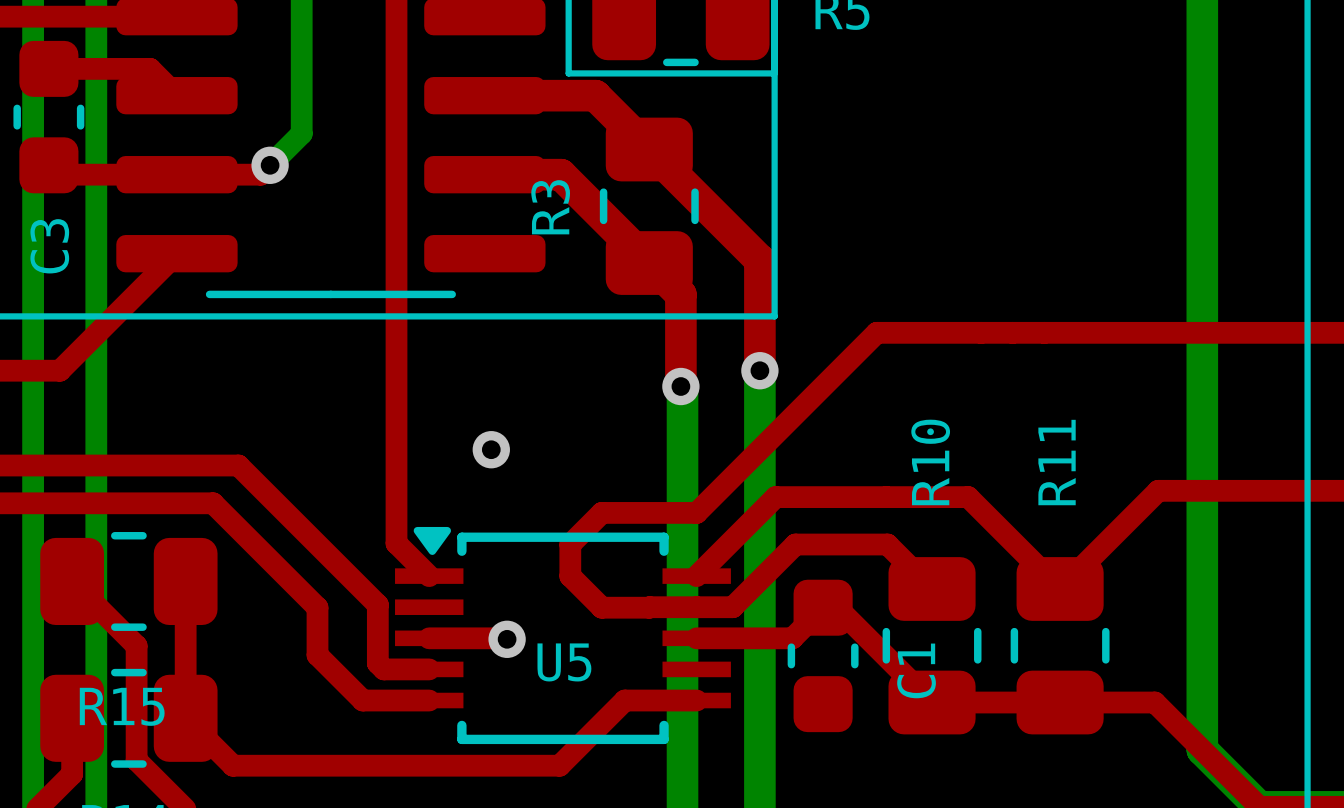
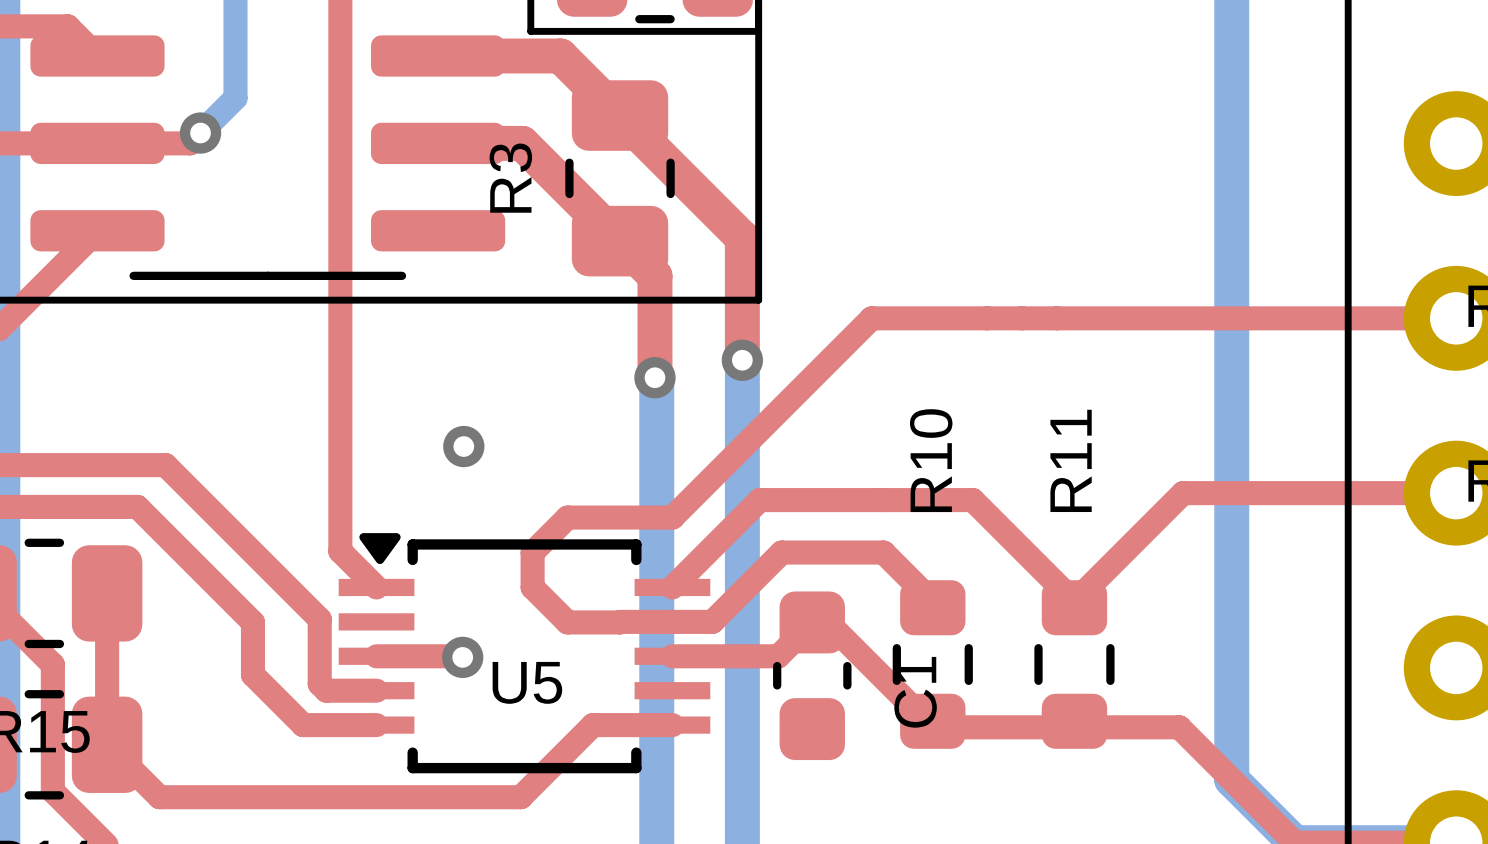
via position: (491, 449) -> (463, 446)
R10 footprint: [882, 557, 982, 735] -> [892, 580, 973, 749]
R11 footprint: [1010, 557, 1110, 735] -> [1034, 580, 1115, 749]

